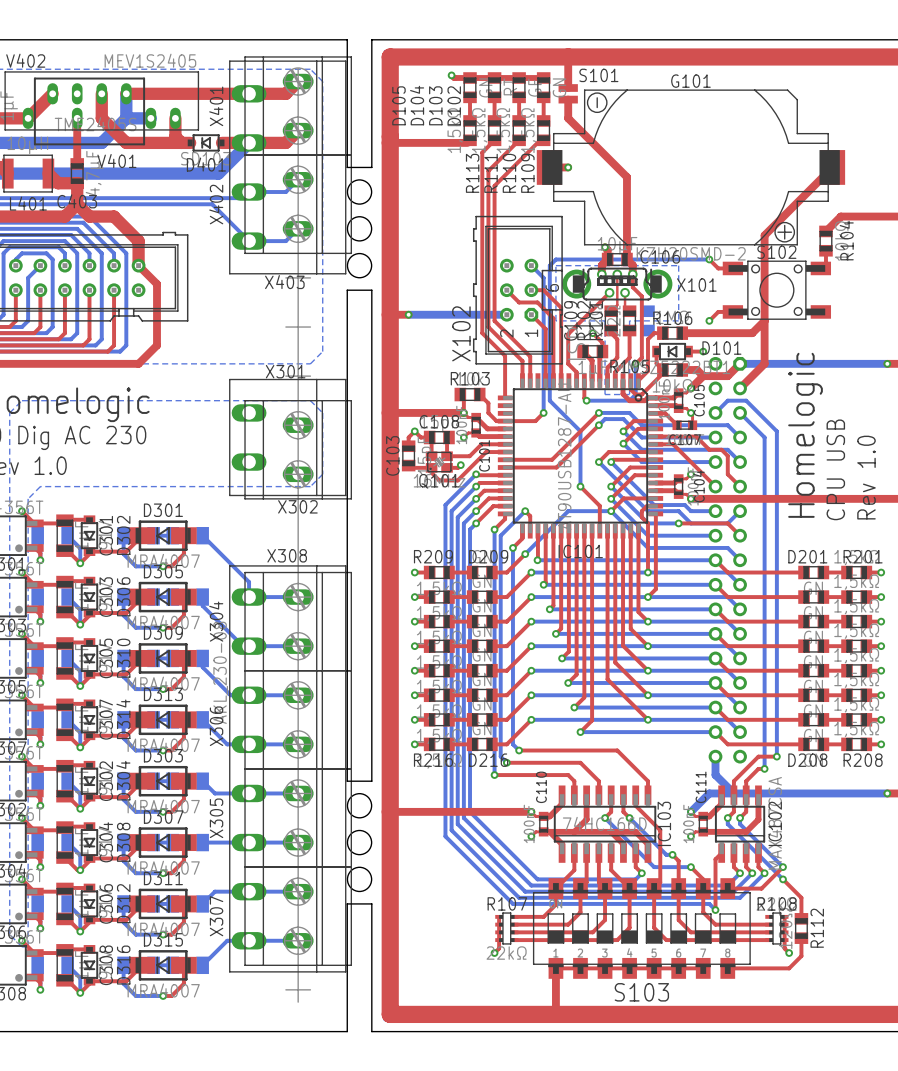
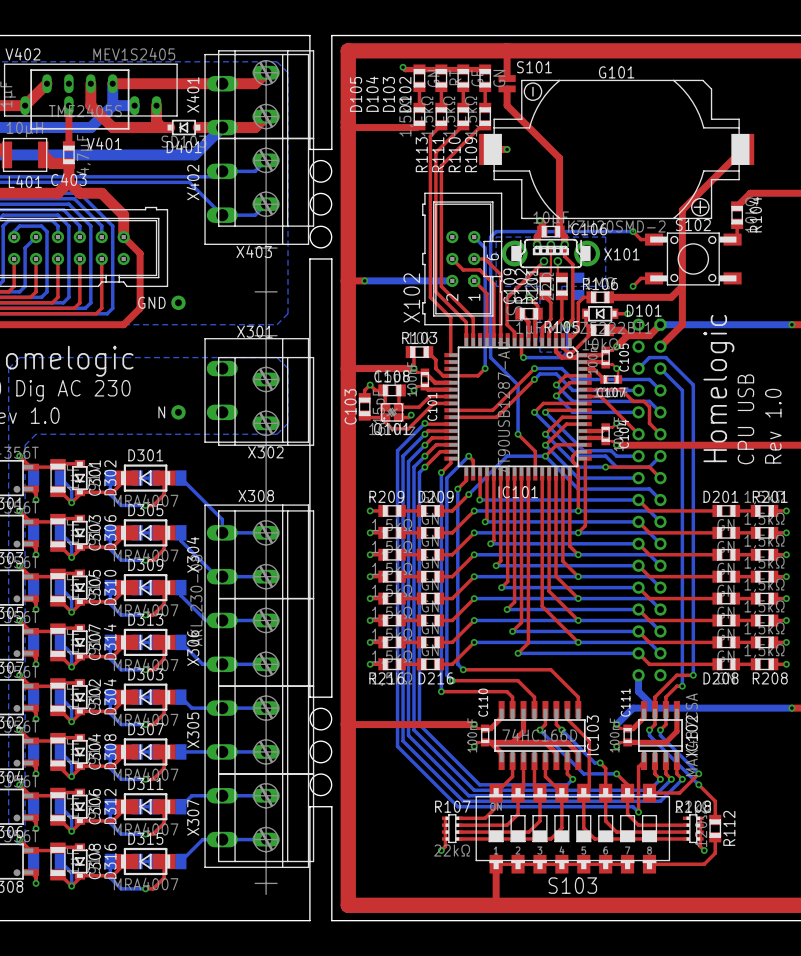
GND: none -> (178, 302)
N: none -> (178, 412)

